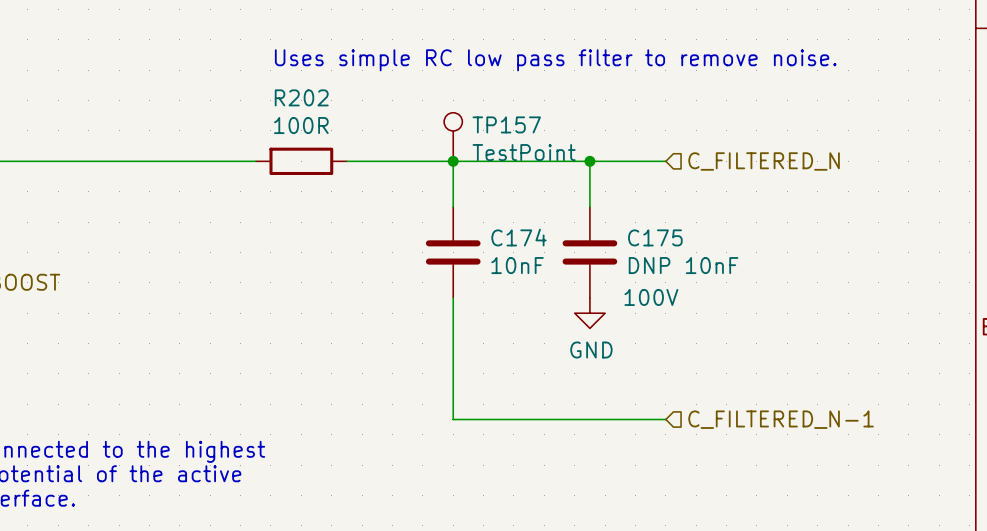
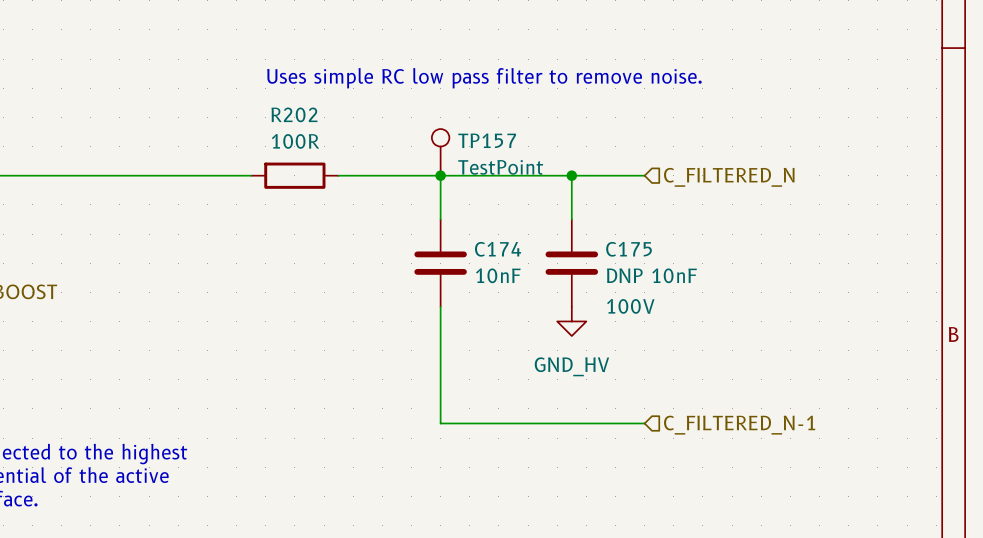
power symbol: GND (589, 313) -> GND_HV (571, 321)

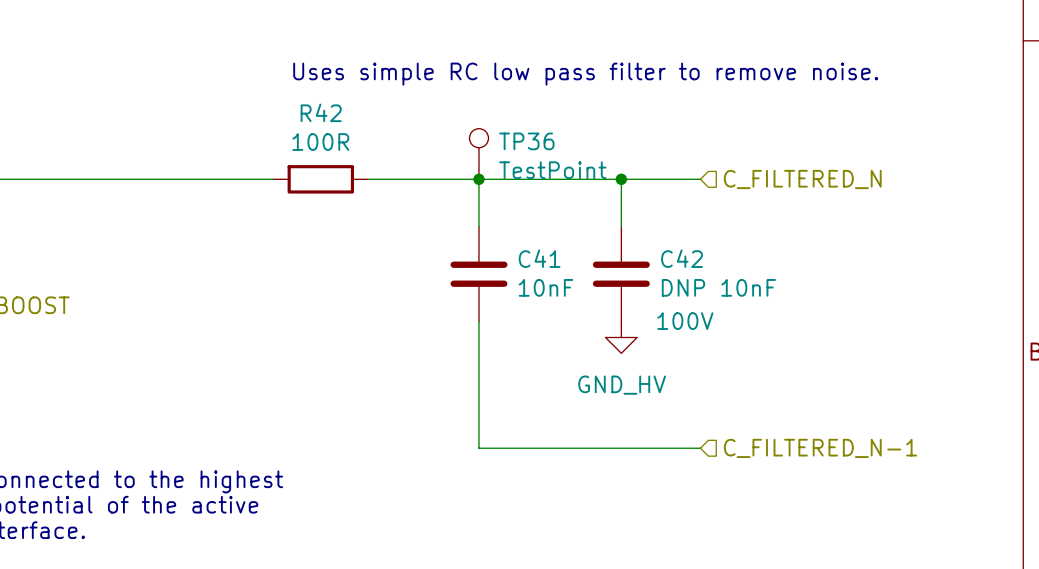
R202 name: R202 (294, 114) -> R42 (321, 112)
TP157 name: TP157 (487, 140) -> TP36 (526, 141)
C174 name: C174 (498, 249) -> C41 (539, 258)
C175 name: C175 (629, 249) -> C42 (681, 258)

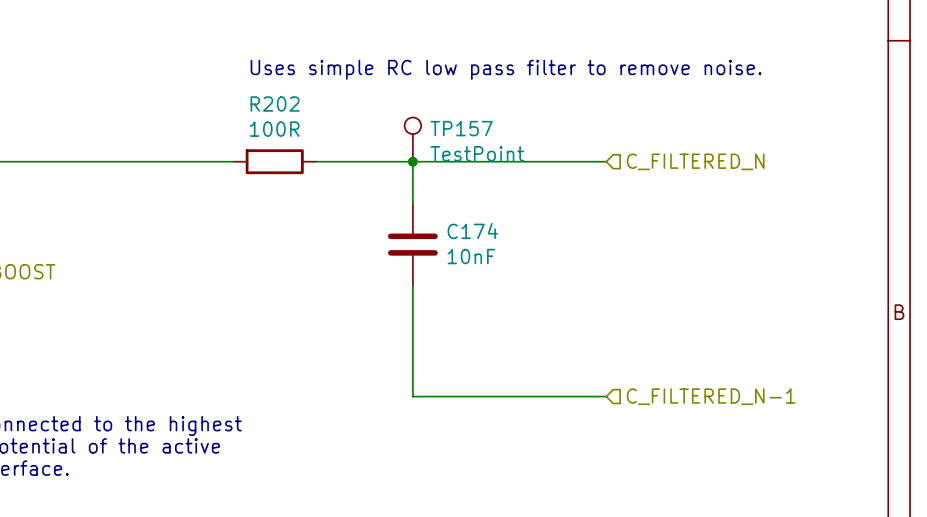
R42 name: R42 (321, 112) -> R202 (275, 104)
TP36 name: TP36 (526, 141) -> TP157 (461, 128)
wire: (621, 179) (621, 226) -> none
junction: (621, 179) -> none
C41 name: C41 (539, 258) -> C174 (472, 231)
C42: DNP 10nF (621, 274) -> none
power symbol: GND_HV (621, 337) -> none

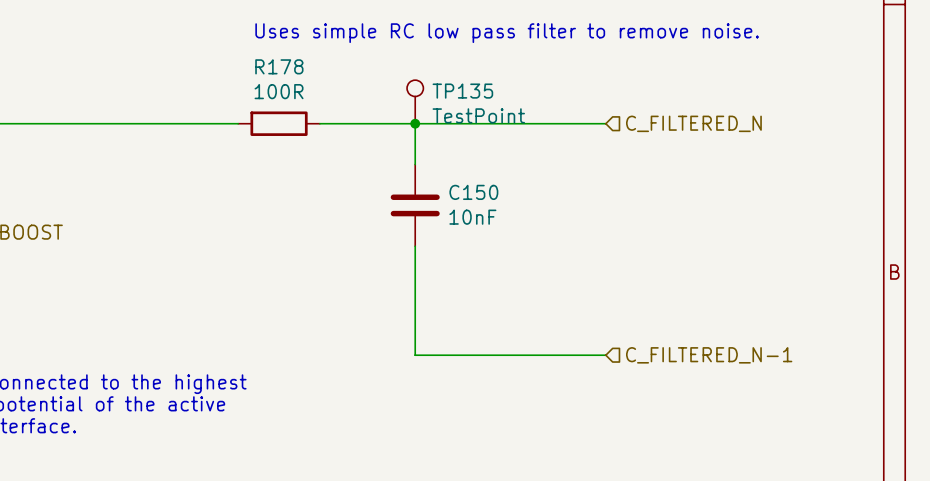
R202 name: R202 (275, 104) -> R178 (279, 66)
TP157 name: TP157 (461, 128) -> TP135 (462, 91)
C174 name: C174 (472, 231) -> C150 (473, 192)

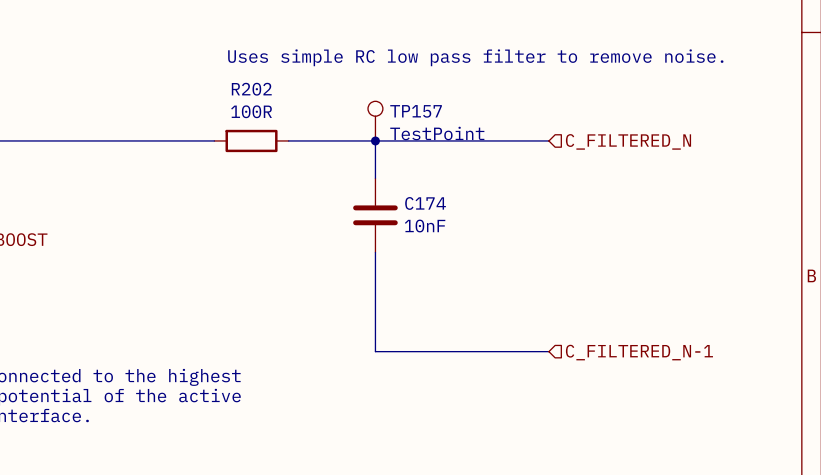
R178 name: R178 (279, 66) -> R202 (251, 89)
TP135 name: TP135 (462, 91) -> TP157 (416, 111)
C150 name: C150 (473, 192) -> C174 (425, 203)

